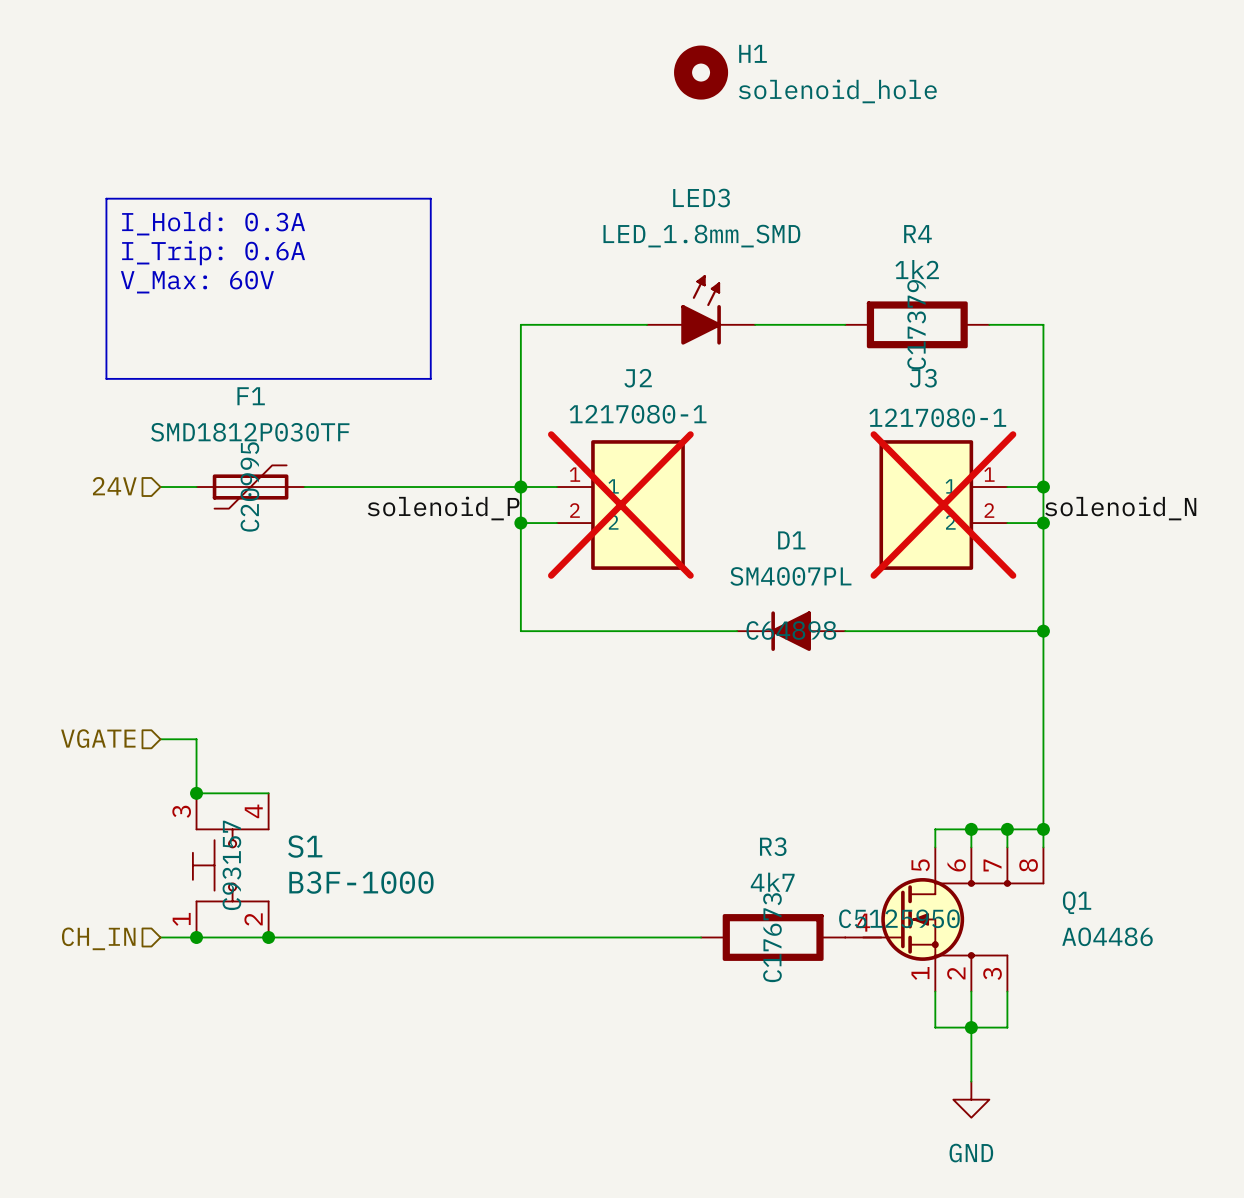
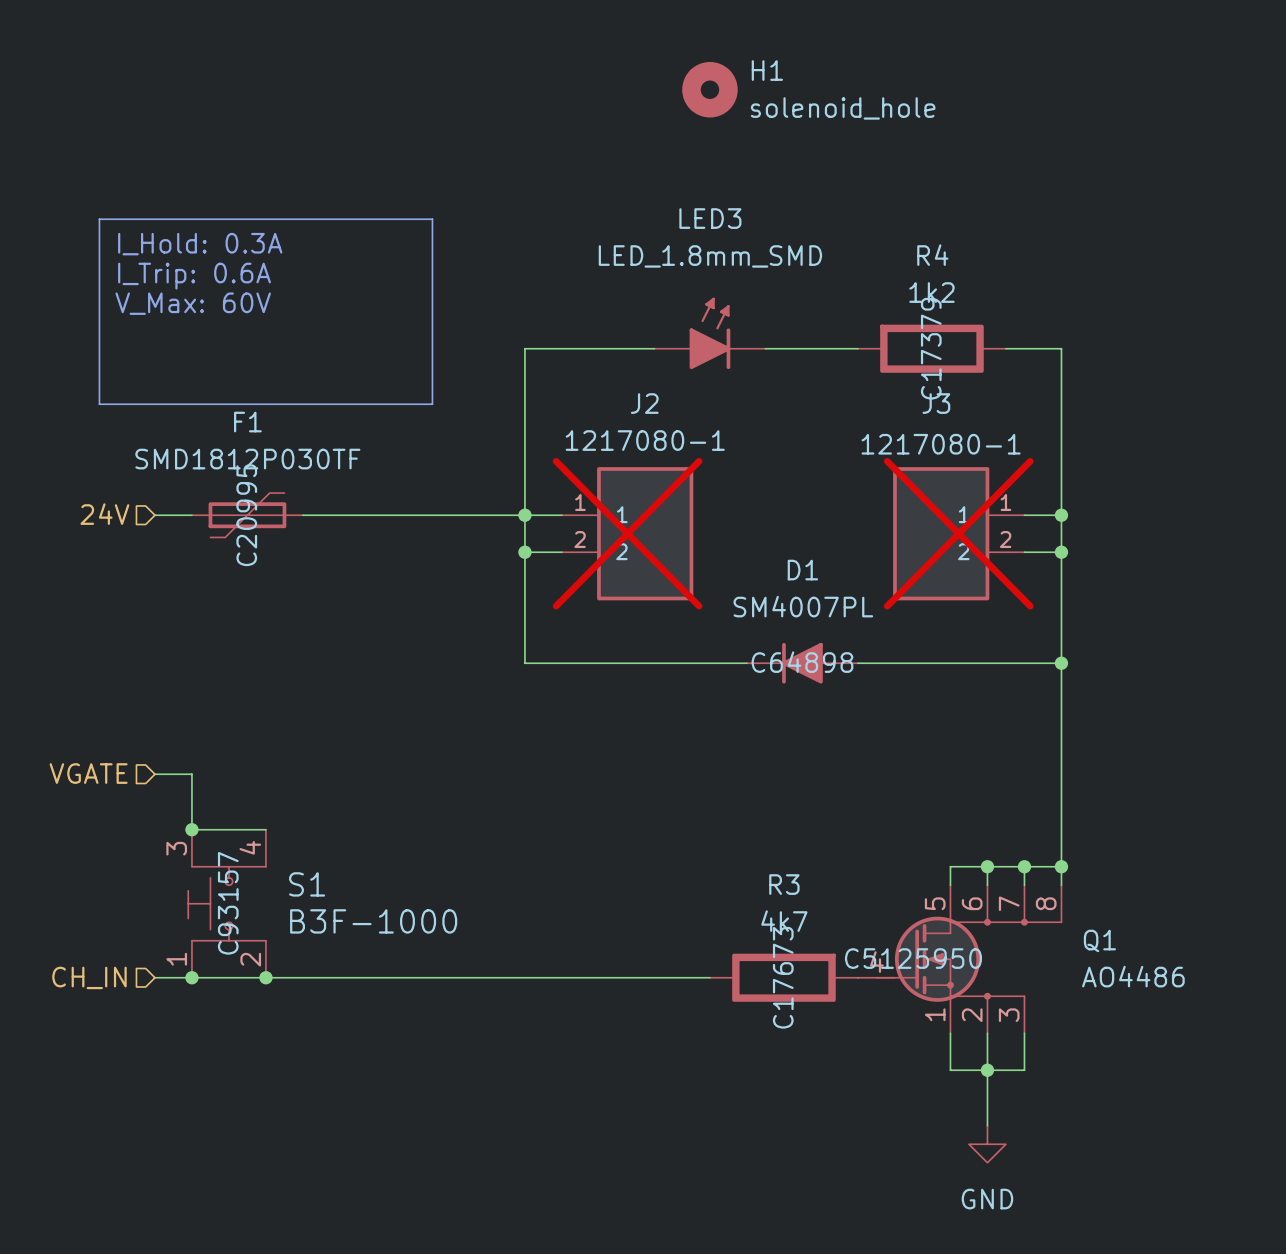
label: solenoid_P (443, 508) -> none
label: solenoid_N (1120, 508) -> none

